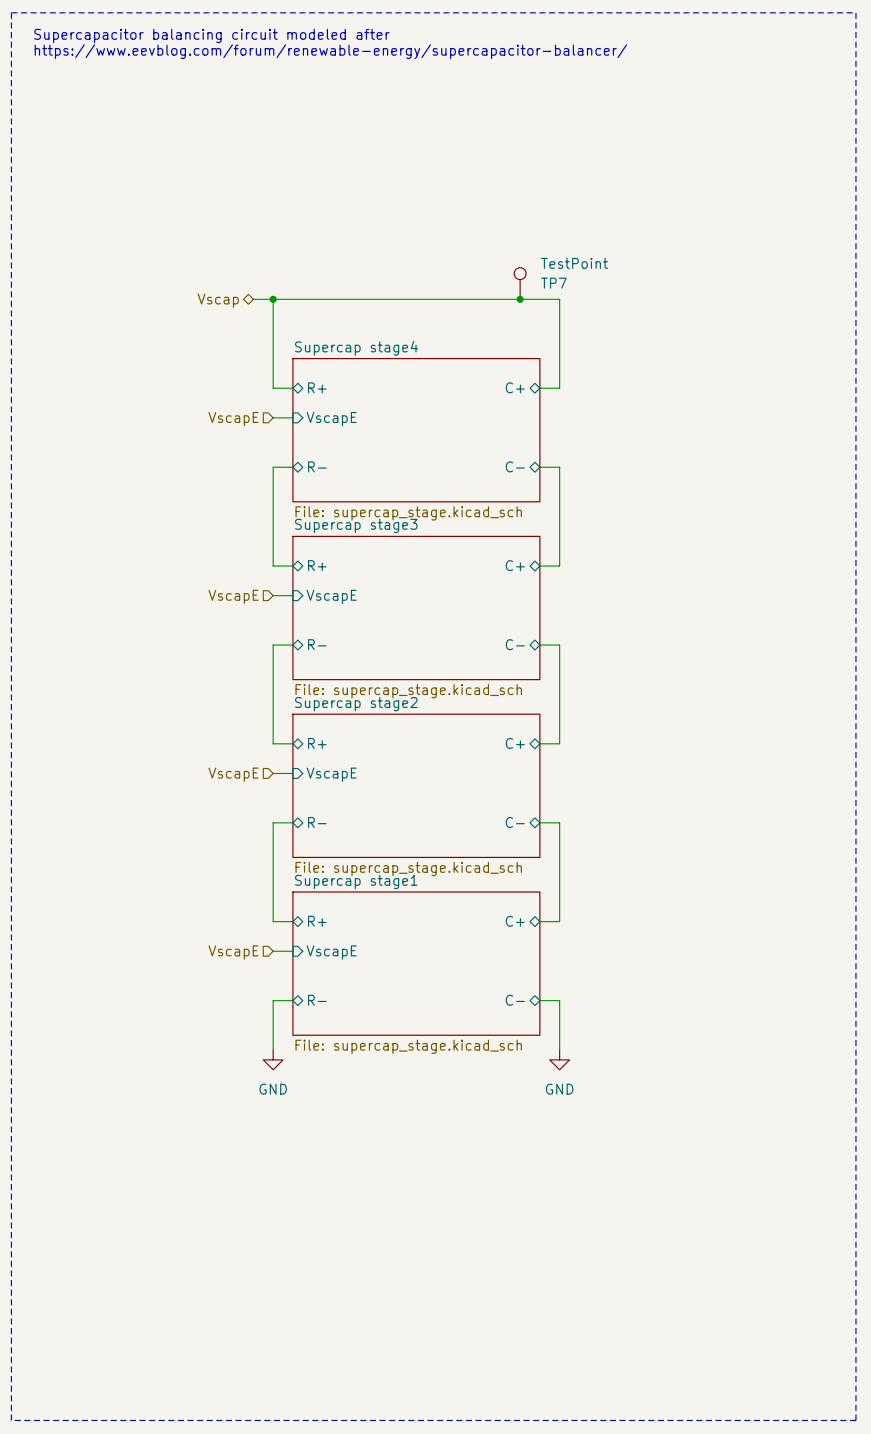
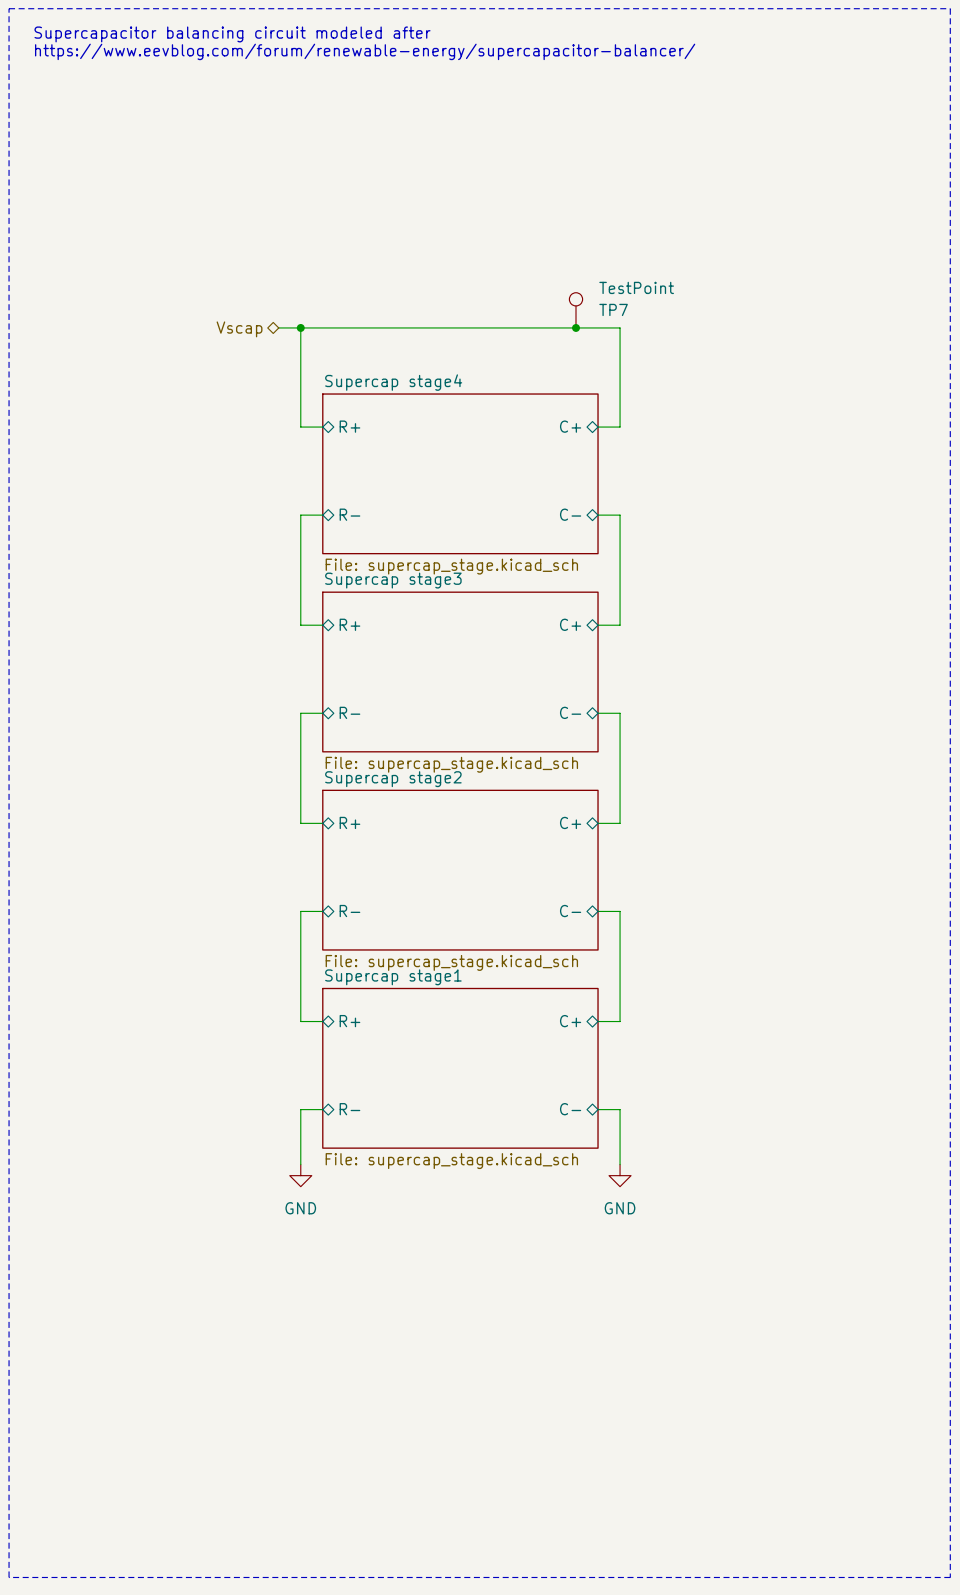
wire: (273, 417) (292, 417) -> none
hierarchical label: VscapE (233, 419) -> none
sheet pin: VscapE (331, 419) -> none
wire: (273, 595) (292, 595) -> none
hierarchical label: VscapE (233, 596) -> none
sheet pin: VscapE (331, 596) -> none
wire: (273, 773) (292, 773) -> none
hierarchical label: VscapE (233, 774) -> none
sheet pin: VscapE (331, 774) -> none
wire: (273, 951) (292, 951) -> none
hierarchical label: VscapE (233, 952) -> none
sheet pin: VscapE (331, 952) -> none

